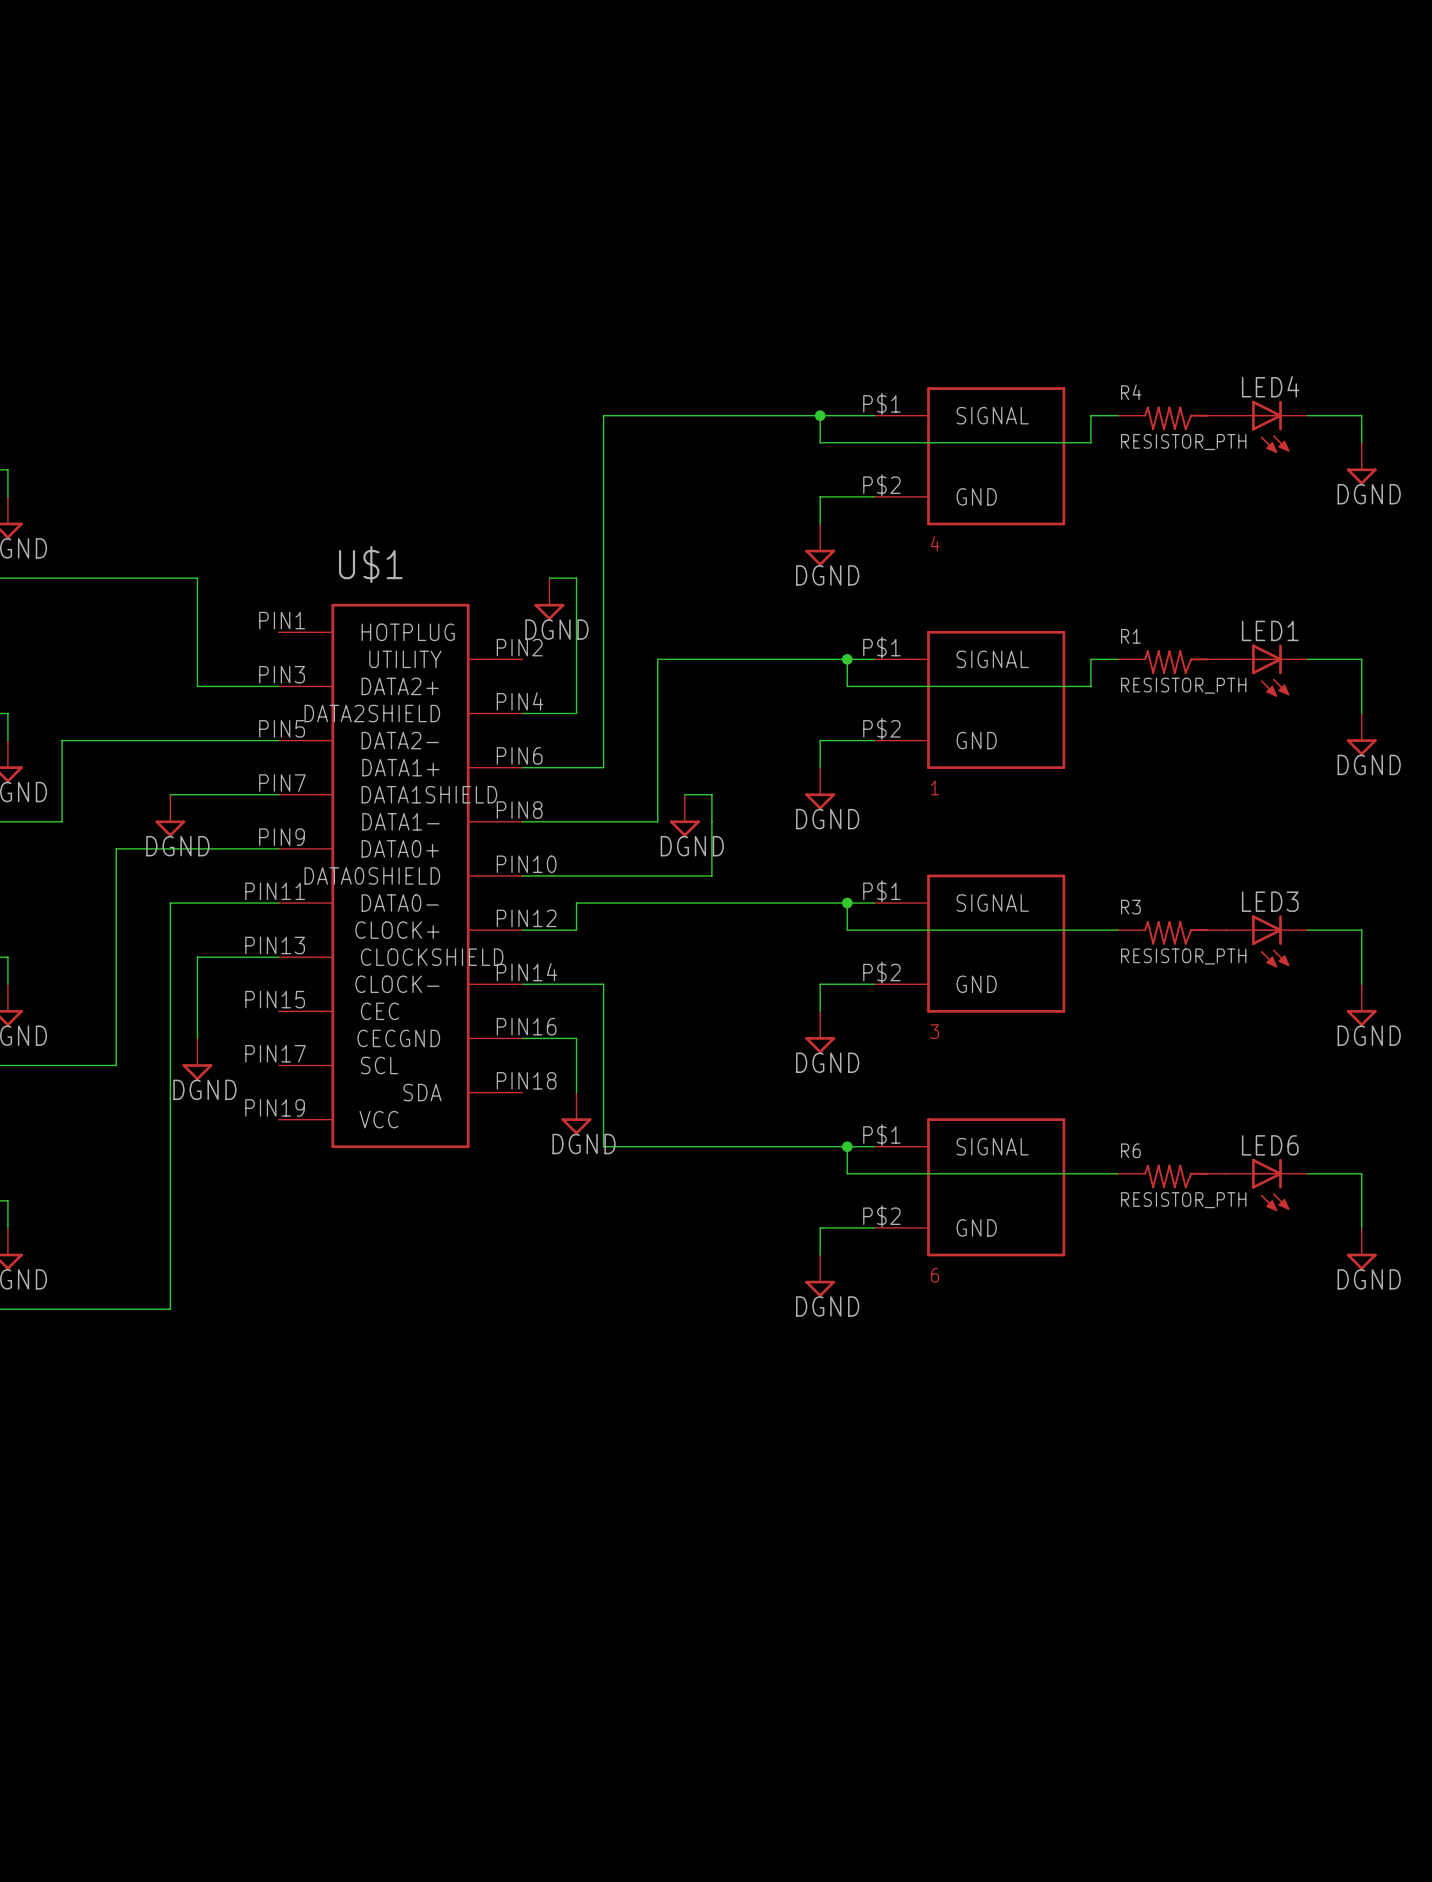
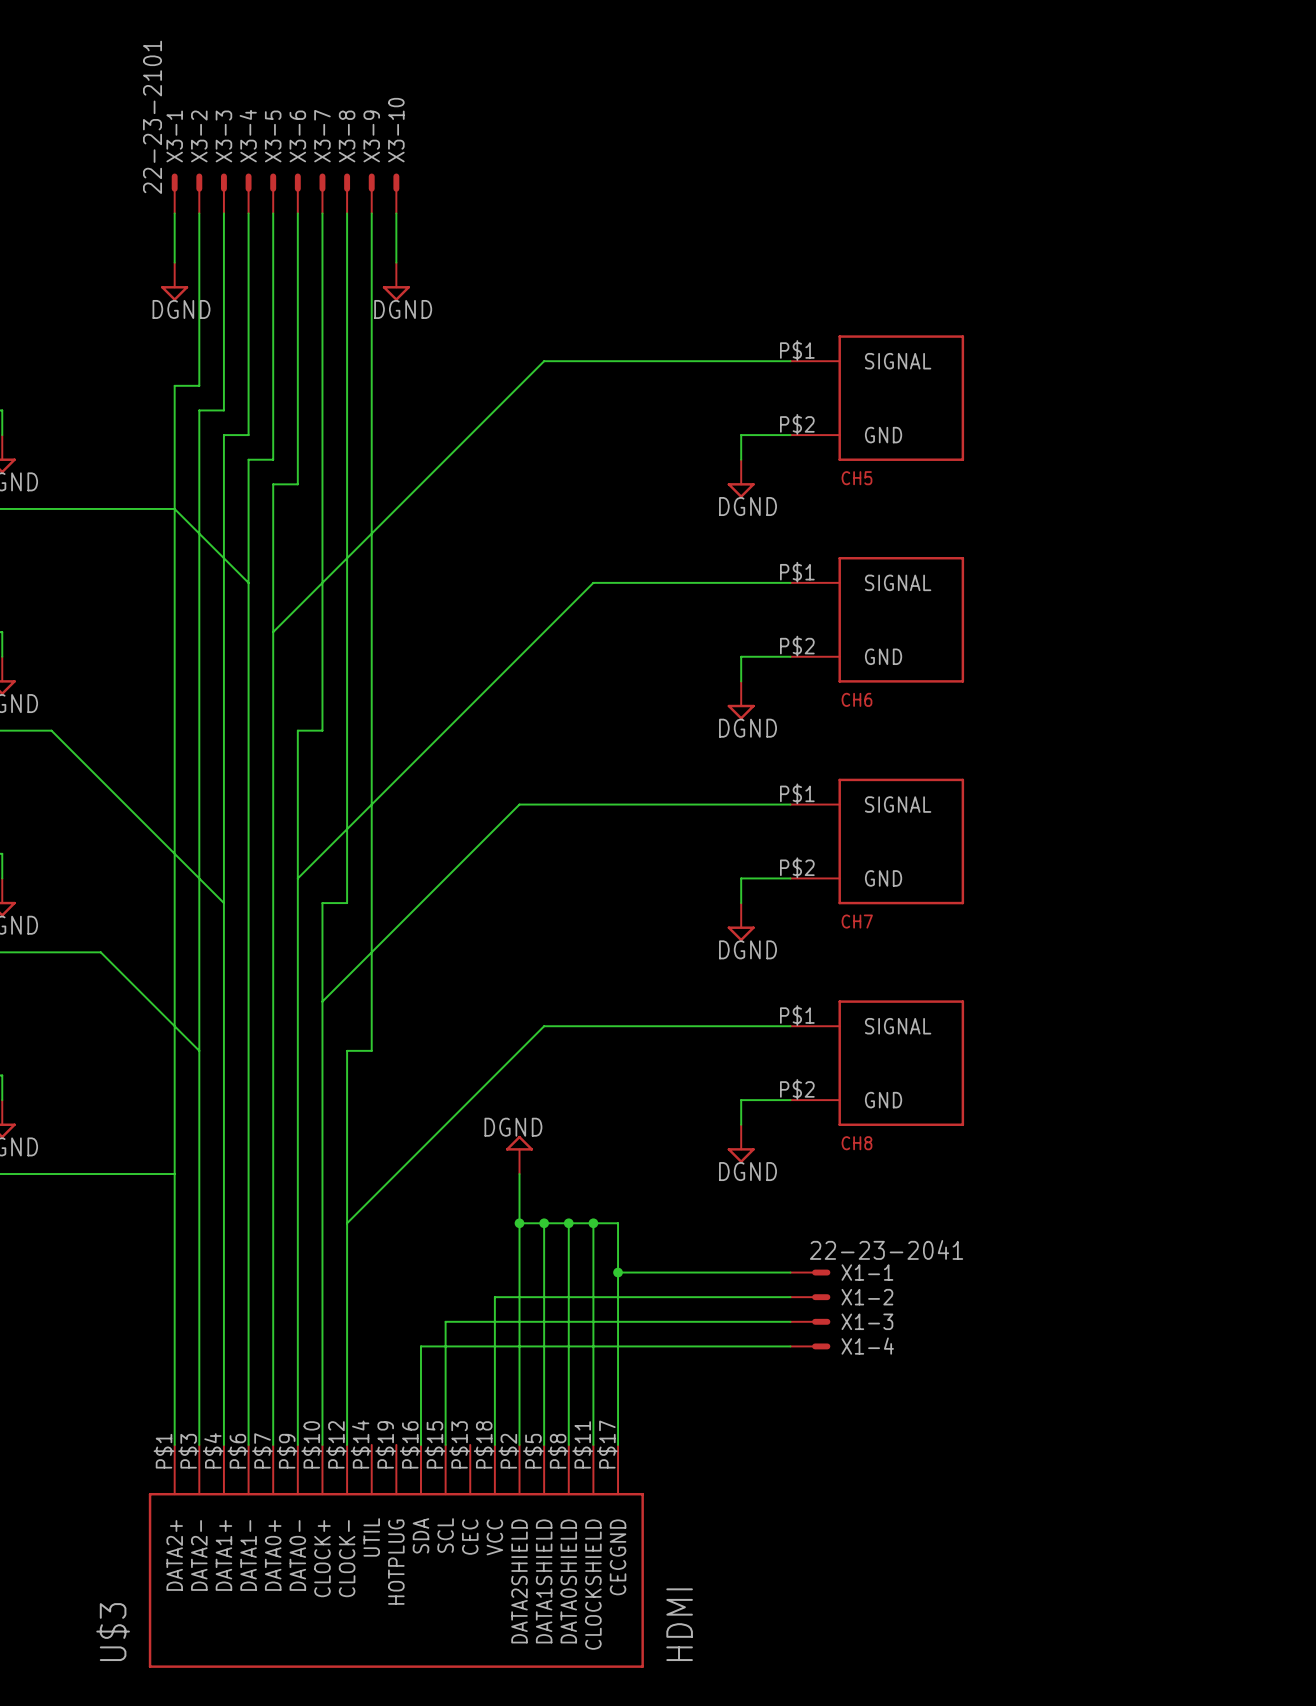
X3-1: none -> 22-23-2101 (174, 193)
X3-2: none -> (199, 193)
X3-3: none -> (223, 193)
X3-4: none -> (248, 193)
X3-5: none -> (273, 193)
X3-6: none -> (297, 193)
X3-7: none -> (322, 193)
X3-8: none -> (347, 193)
X3-9: none -> (371, 193)
X3-10: none -> (396, 193)
wire: none -> (174, 213) (174, 262)
wire: none -> (199, 213) (199, 385) (174, 385) (174, 508) (248, 582)
wire: none -> (223, 213) (223, 410) (199, 410) (199, 1444)
wire: none -> (248, 213) (248, 435) (223, 435) (223, 1444)
wire: none -> (273, 213) (273, 459) (248, 459) (248, 1444)
wire: none -> (297, 213) (297, 484) (273, 484) (273, 1444)
wire: none -> (322, 213) (322, 730) (297, 730) (297, 1444)
wire: none -> (347, 213) (347, 903) (322, 903) (322, 1444)
wire: none -> (371, 213) (371, 1050) (347, 1050) (347, 1444)
wire: none -> (396, 213) (396, 262)
power symbol: none -> DGND (174, 281)
power symbol: none -> DGND (396, 281)
wire: (603, 415) (603, 767) (522, 767) -> (544, 361) (273, 632)
wire: (820, 415) (820, 442) (1090, 442) (1090, 415) (1118, 415) -> none
junction: (820, 415) -> none
wire: (1307, 415) (1361, 415) (1361, 442) -> none
R4: RESISTOR_PTH (1172, 418) -> none
LED4: (1266, 426) -> none
power symbol: DGND (1361, 463) -> none
4 name: 4 (935, 543) -> CH5 (856, 478)
wire: (549, 578) (576, 578) (576, 713) (522, 713) -> none
power symbol: DGND (549, 599) -> none
wire: (657, 659) (657, 821) (522, 821) -> (593, 582) (297, 878)
wire: (847, 659) (847, 686) (1090, 686) (1090, 659) (1118, 659) -> none
junction: (847, 659) -> none
wire: (1307, 659) (1361, 659) (1361, 713) -> none
R1: RESISTOR_PTH (1172, 662) -> none
LED1: (1266, 670) -> none
wire: (197, 686) (278, 686) -> (174, 607) (174, 853)
power symbol: DGND (1361, 734) -> none
wire: (278, 740) (62, 740) (62, 821) -> (223, 903) (51, 730)
1 name: 1 (935, 787) -> CH6 (856, 699)
wire: (170, 794) (278, 794) -> none
wire: (684, 794) (711, 794) (711, 875) (522, 875) -> none
power symbol: DGND (170, 815) -> none
power symbol: DGND (684, 815) -> none
wire: (278, 848) (116, 848) (116, 1065) -> (199, 1050) (100, 952)
U$1: (400, 875) -> none
wire: (278, 903) (170, 903) (170, 1309) -> (174, 1174) (150, 1174)
wire: (576, 903) (576, 930) (522, 930) -> (519, 804) (322, 1001)
wire: (847, 903) (847, 930) (1118, 930) -> none
junction: (847, 903) -> none
wire: (1307, 930) (1361, 930) (1361, 984) -> none
R3: RESISTOR_PTH (1172, 932) -> none
LED3: (1266, 941) -> none
wire: (197, 957) (278, 957) -> none
wire: (522, 984) (603, 984) (603, 1146) -> (347, 1223) (544, 1026)
power symbol: DGND (1361, 1005) -> none
3 name: 3 (934, 1031) -> CH7 (857, 921)
wire: none -> (174, 927) (174, 1444)
wire: (522, 1038) (576, 1038) (576, 1092) -> none
power symbol: DGND (197, 1059) -> none
power symbol position: DGND (576, 1113) -> DGND (519, 1154)
power symbol rotation: 0° (576, 1126) -> 180° (519, 1143)
wire: (847, 1146) (847, 1173) (1118, 1173) -> none
junction: (847, 1146) -> none
wire: (1307, 1173) (1361, 1173) (1361, 1227) -> none
R6: RESISTOR_PTH (1172, 1176) -> none
LED6: (1266, 1185) -> none
power symbol: DGND (1361, 1248) -> none
6 name: 6 (935, 1275) -> CH8 (856, 1143)
wire: none -> (519, 1174) (519, 1444)
wire: none -> (519, 1223) (618, 1223) (618, 1444)
junction: none -> (519, 1223)
wire: none -> (544, 1223) (544, 1444)
junction: none -> (544, 1223)
wire: none -> (568, 1223) (568, 1444)
junction: none -> (568, 1223)
wire: none -> (593, 1223) (593, 1444)
junction: none -> (593, 1223)
wire: none -> (618, 1272) (790, 1272)
junction: none -> (618, 1272)
X1-1: none -> 22-23-2041 (810, 1272)
wire: none -> (790, 1297) (494, 1297) (494, 1444)
X1-2: none -> (810, 1297)
wire: none -> (790, 1321) (445, 1321) (445, 1444)
X1-3: none -> (810, 1321)
wire: none -> (790, 1346) (420, 1346) (420, 1444)
X1-4: none -> (810, 1346)
U$3: none -> HDMI (396, 1556)

